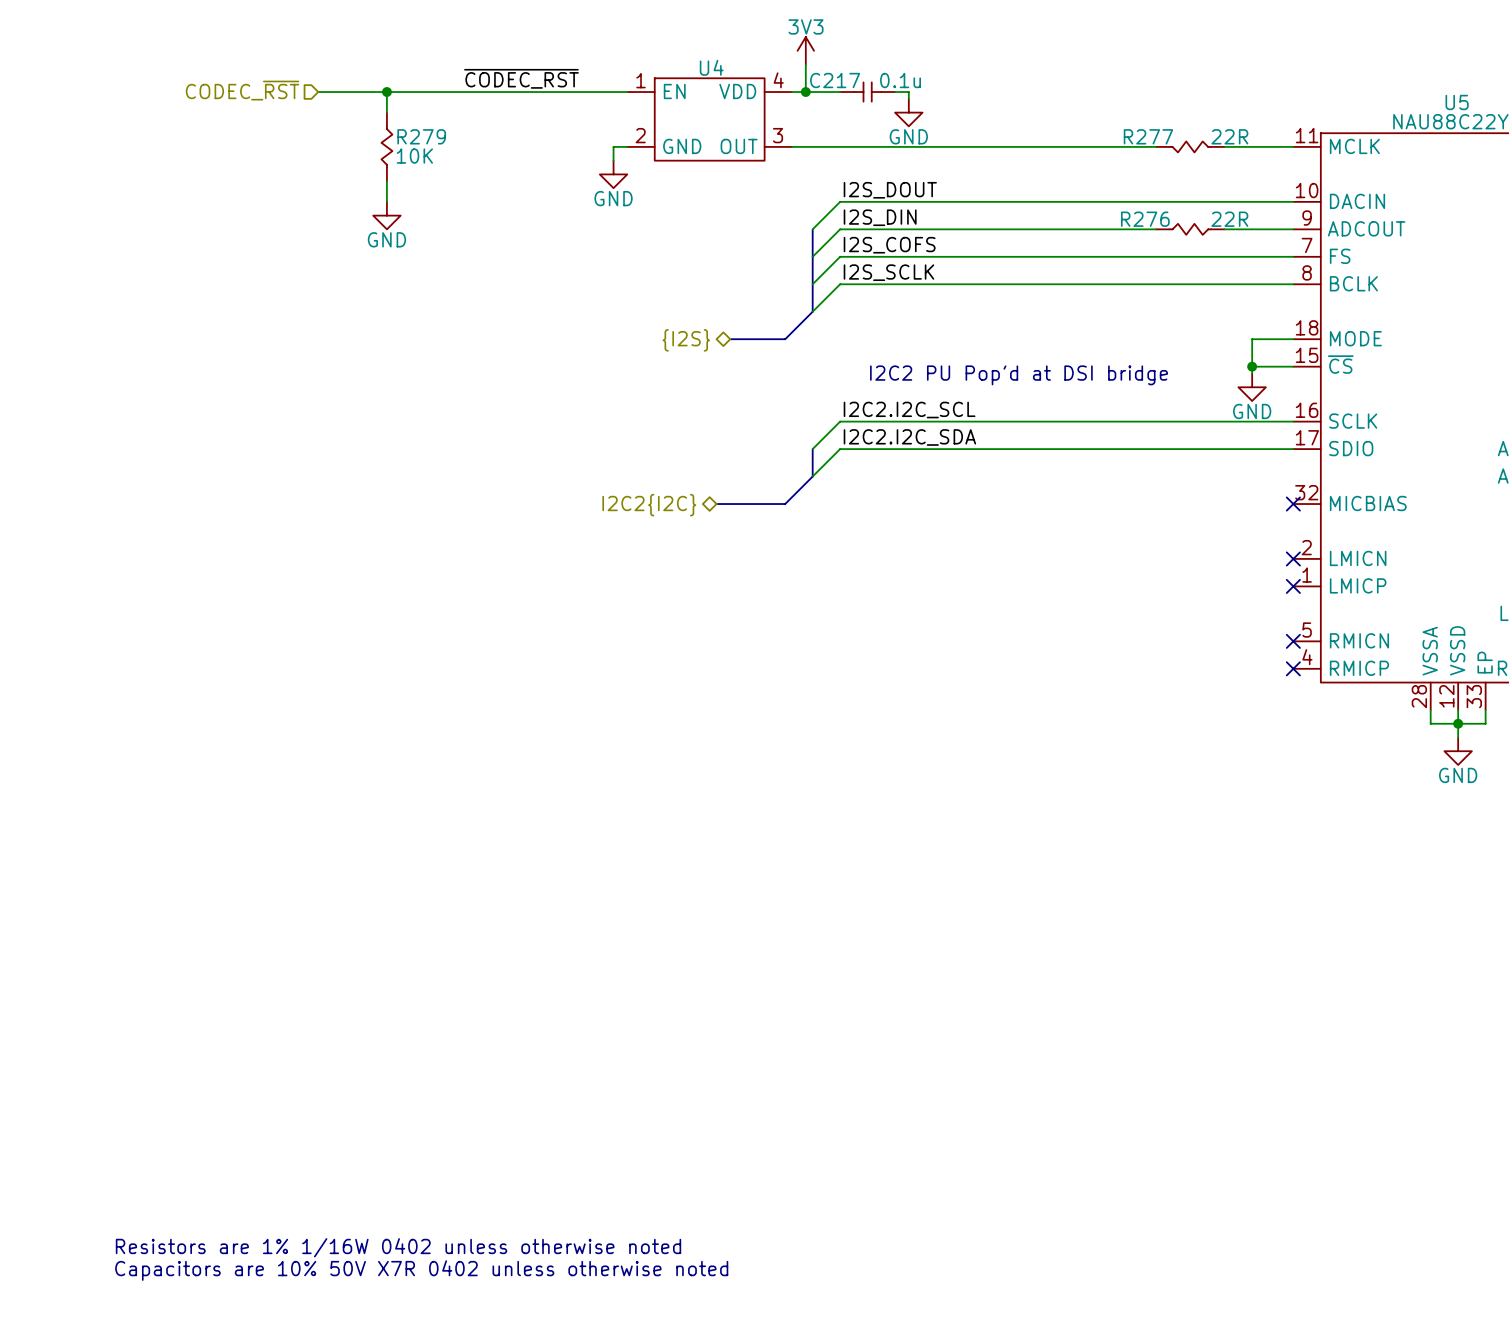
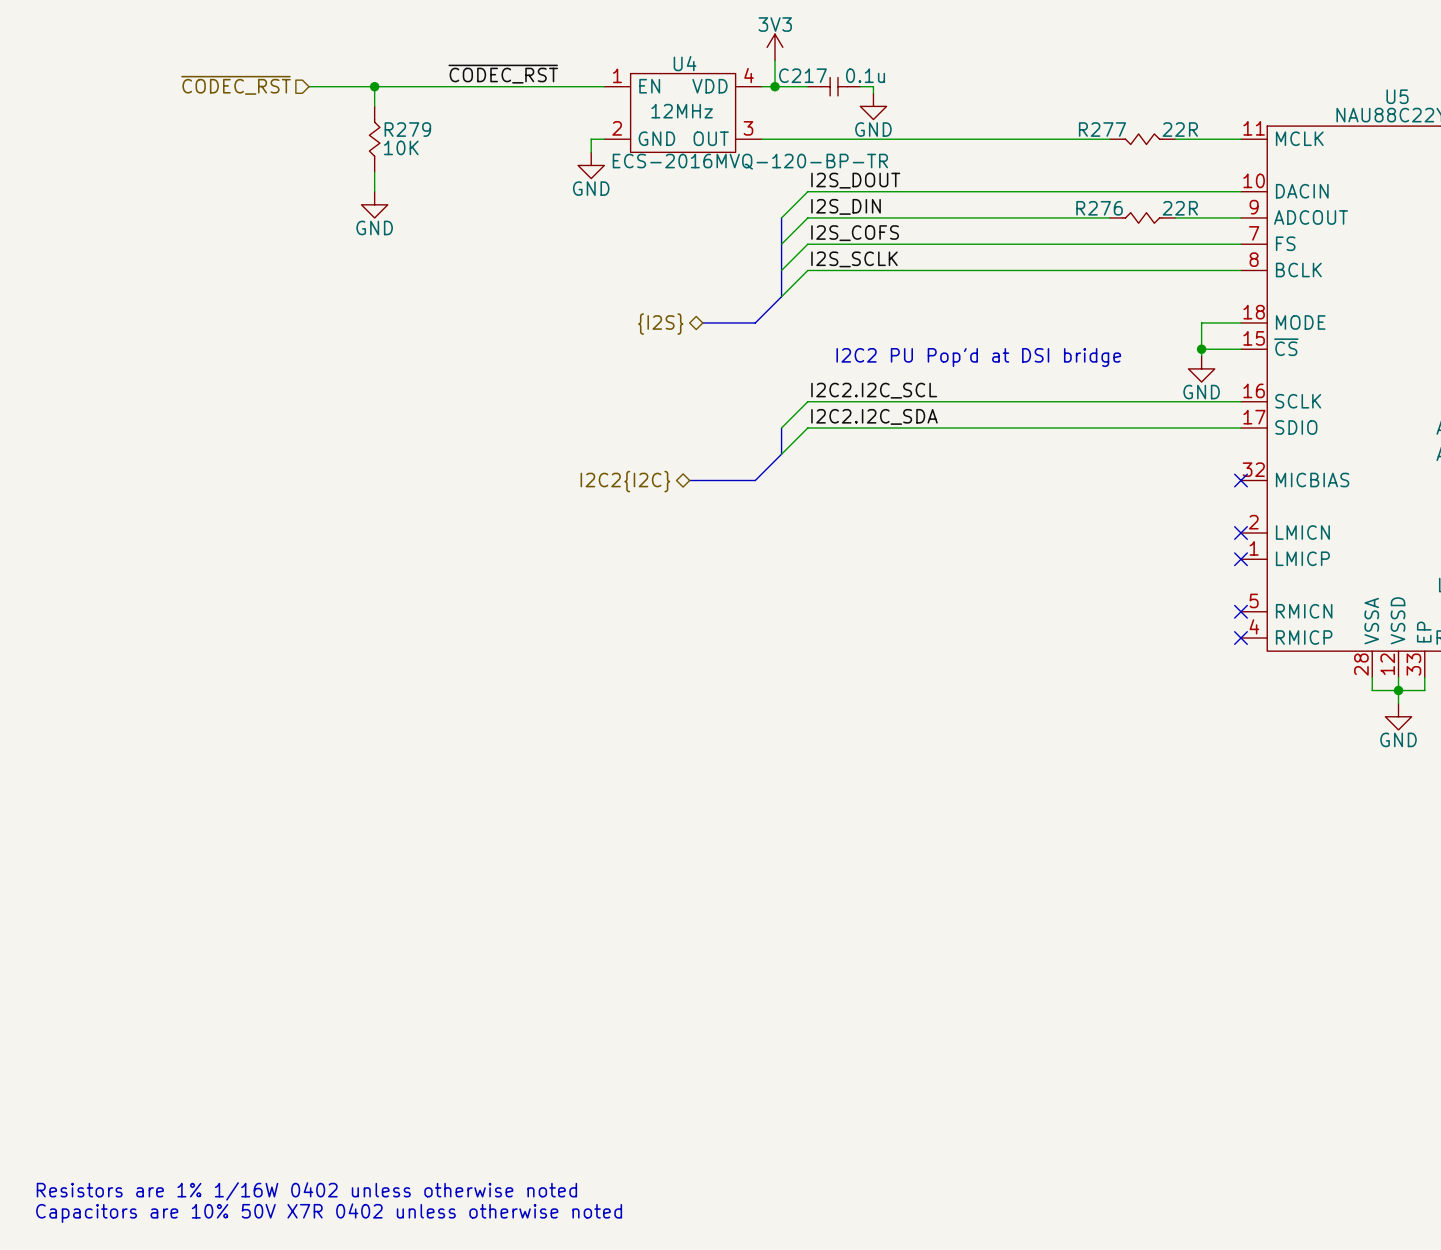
hierarchical label: CODEC_~{RST} (242, 90) -> ~{CODEC_RST} (236, 85)
U4 text: none -> 12MHz (682, 111)
U4 text: none -> ECS-2016MVQ-120-BP-TR (750, 161)
text position: Resistors are 1% 1/16W 0402 unless otherwise noted (398, 1247) -> Resistors are 1% 1/16W 0402 unless otherwise noted (306, 1191)
text position: Capacitors are 10% 50V X7R 0402 unless otherwise noted (421, 1270) -> Capacitors are 10% 50V X7R 0402 unless otherwise noted (329, 1213)

